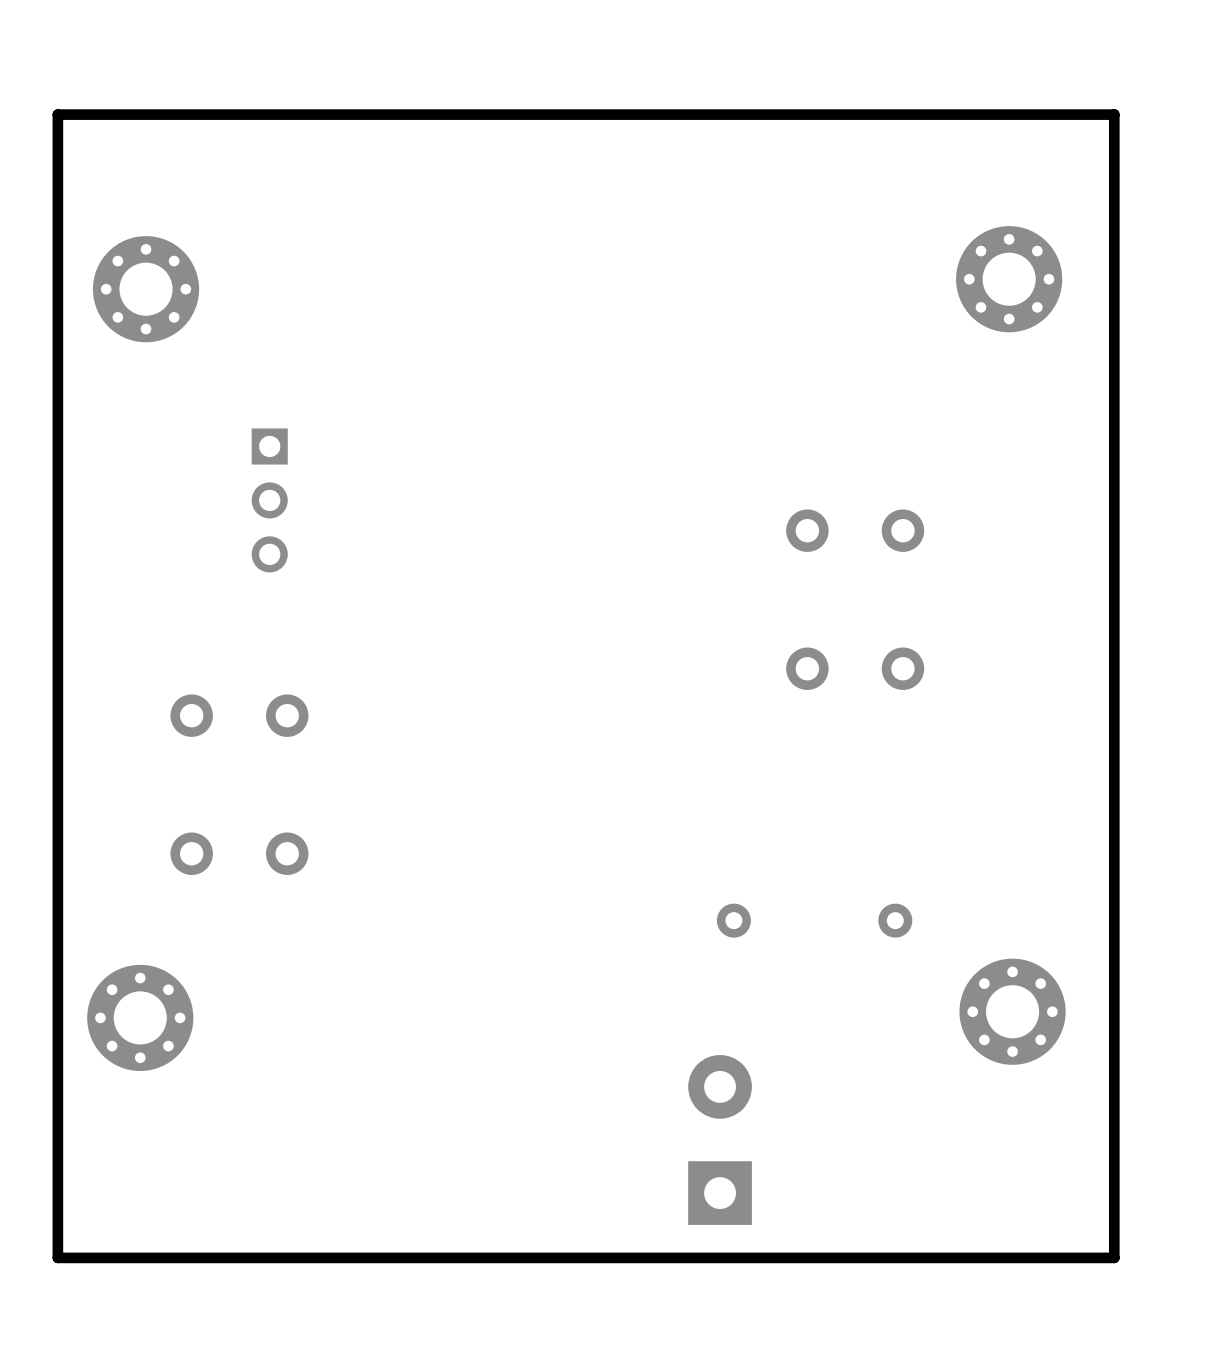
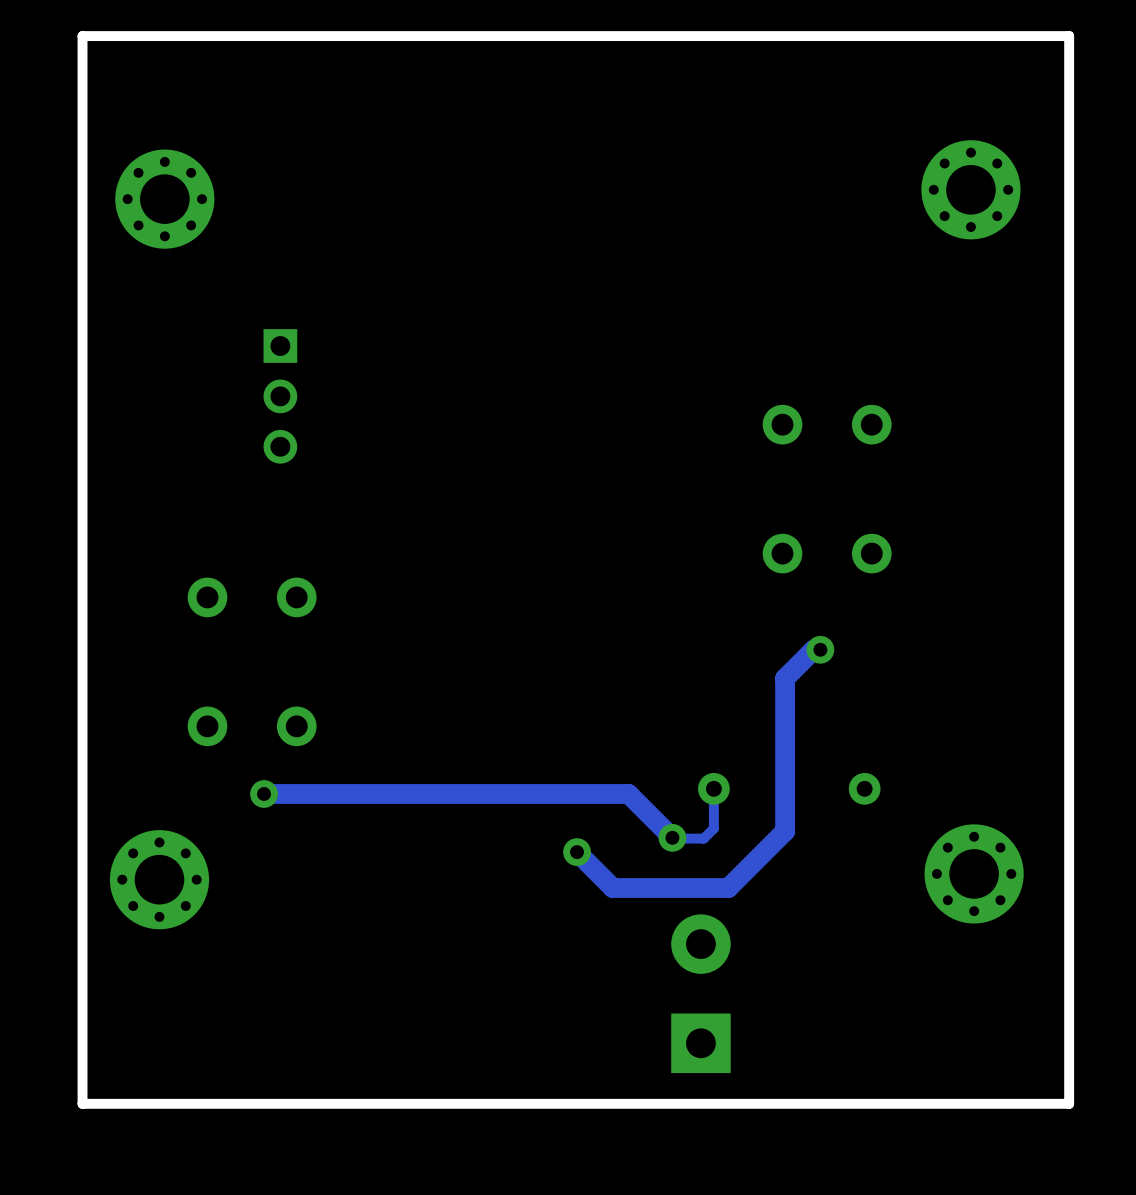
track: none -> (820, 649) (813, 649) (785, 678) (785, 831) (728, 888) (612, 888) (577, 852)
via: none -> (820, 649)
track: none -> (713, 788) (713, 828) (703, 838) (673, 838) (628, 793) (264, 793)
via: none -> (264, 793)
via: none -> (672, 837)
via: none -> (577, 852)

